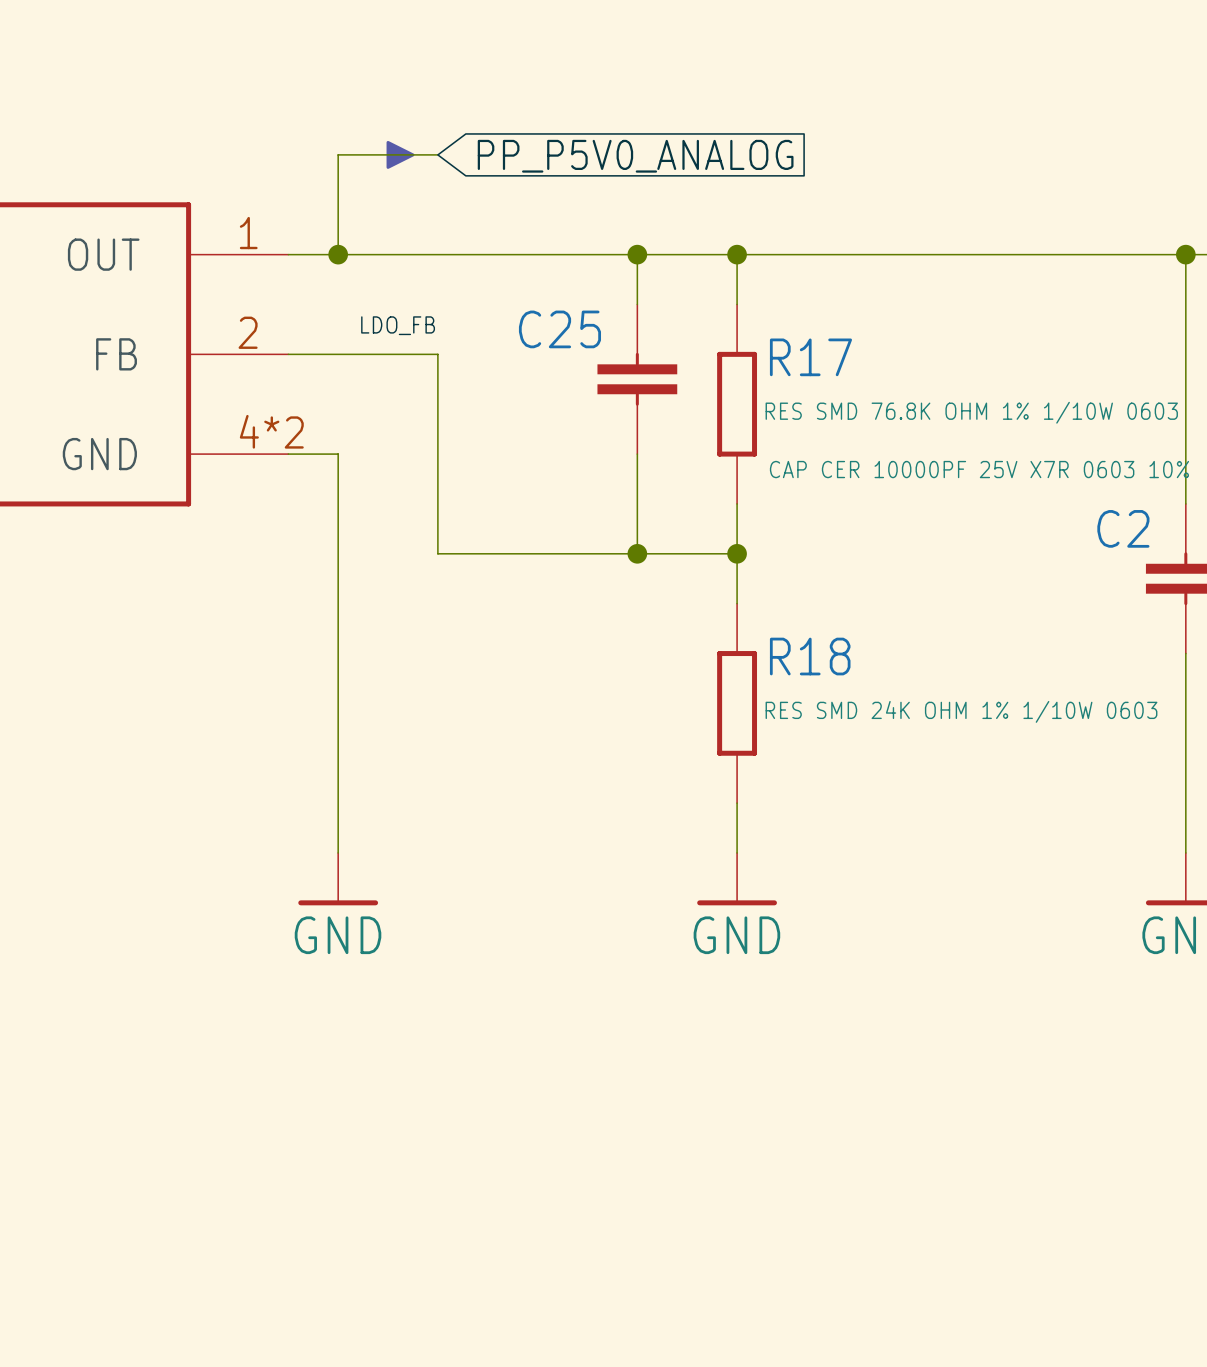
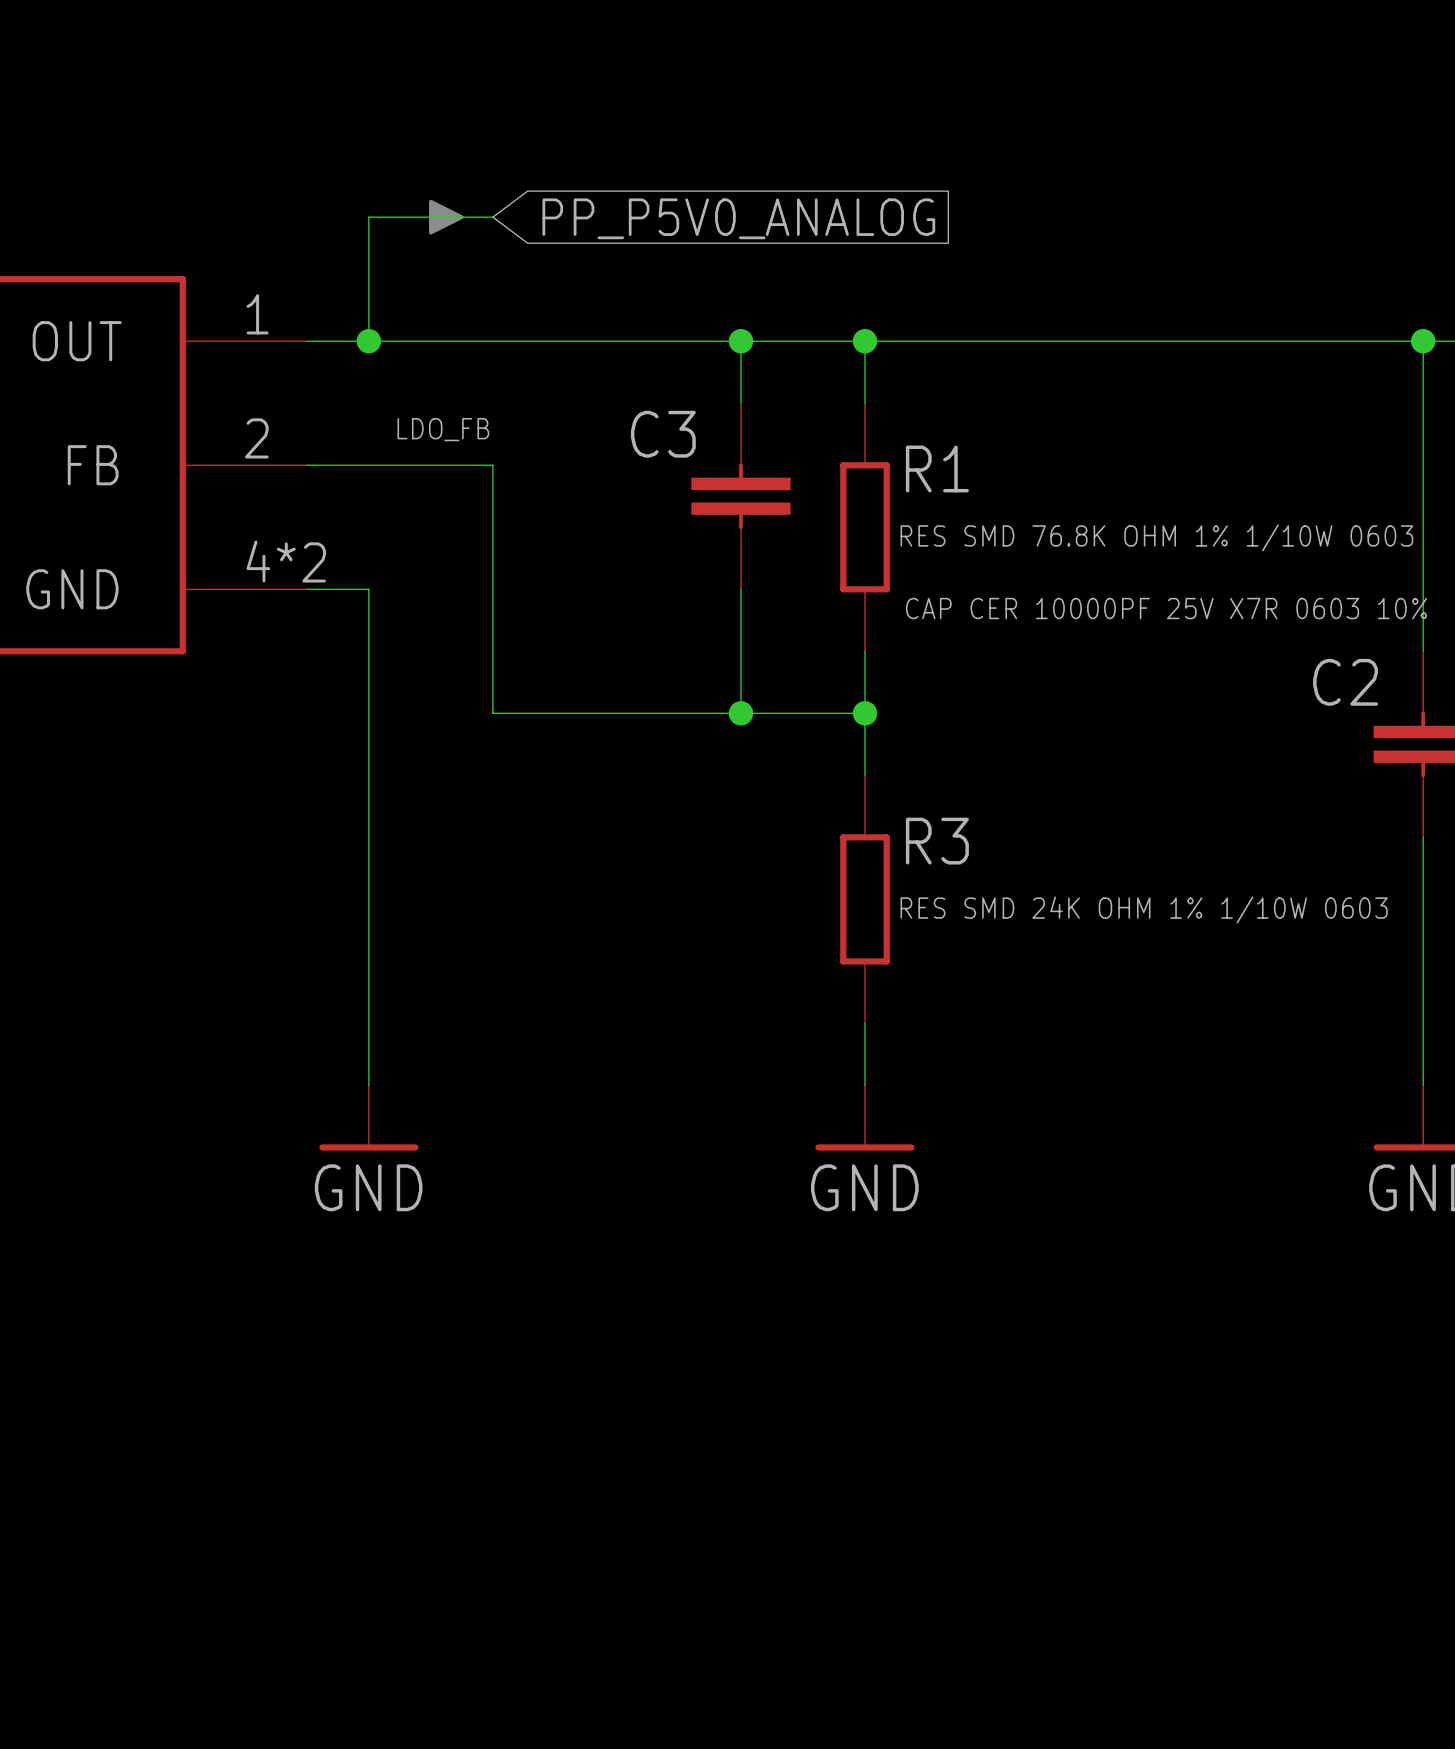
C25 name: C25 (559, 329) -> C3 (663, 434)
R17 name: R17 (810, 357) -> R1 (937, 468)
R18 name: R18 (810, 656) -> R3 (937, 841)

